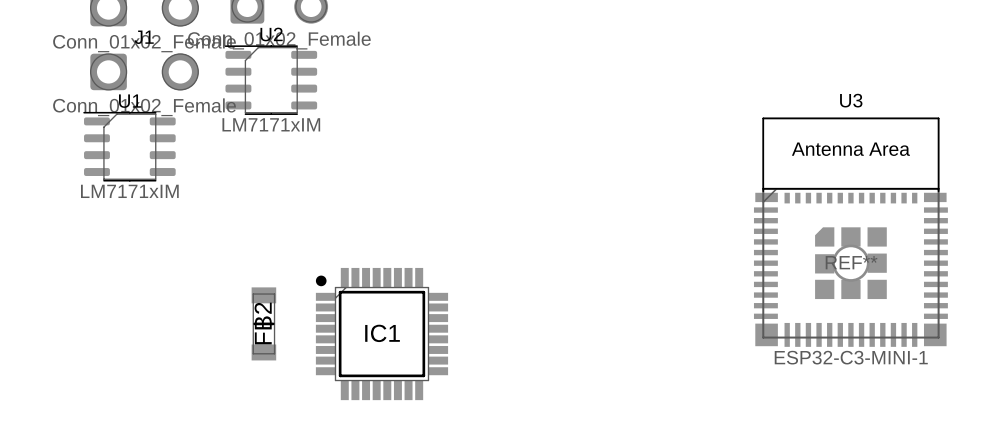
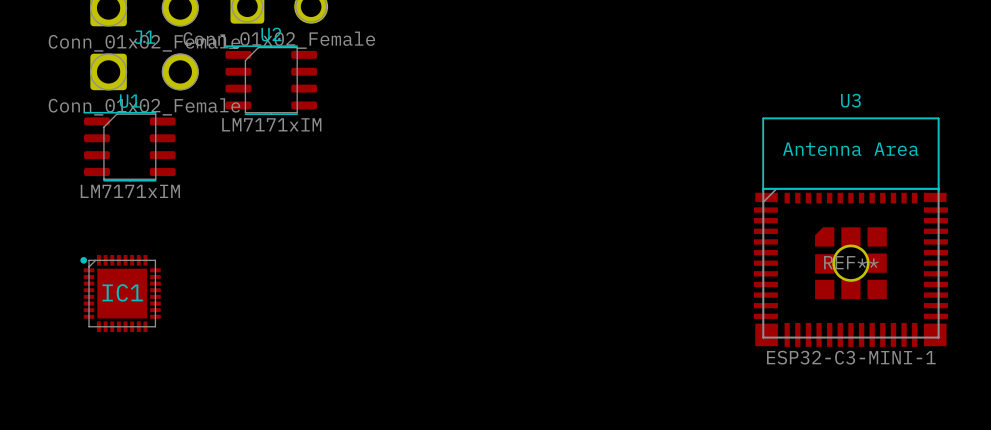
IC1 footprint: [315, 267, 449, 401] -> [80, 255, 161, 333]
FB2: (263, 323) -> none

